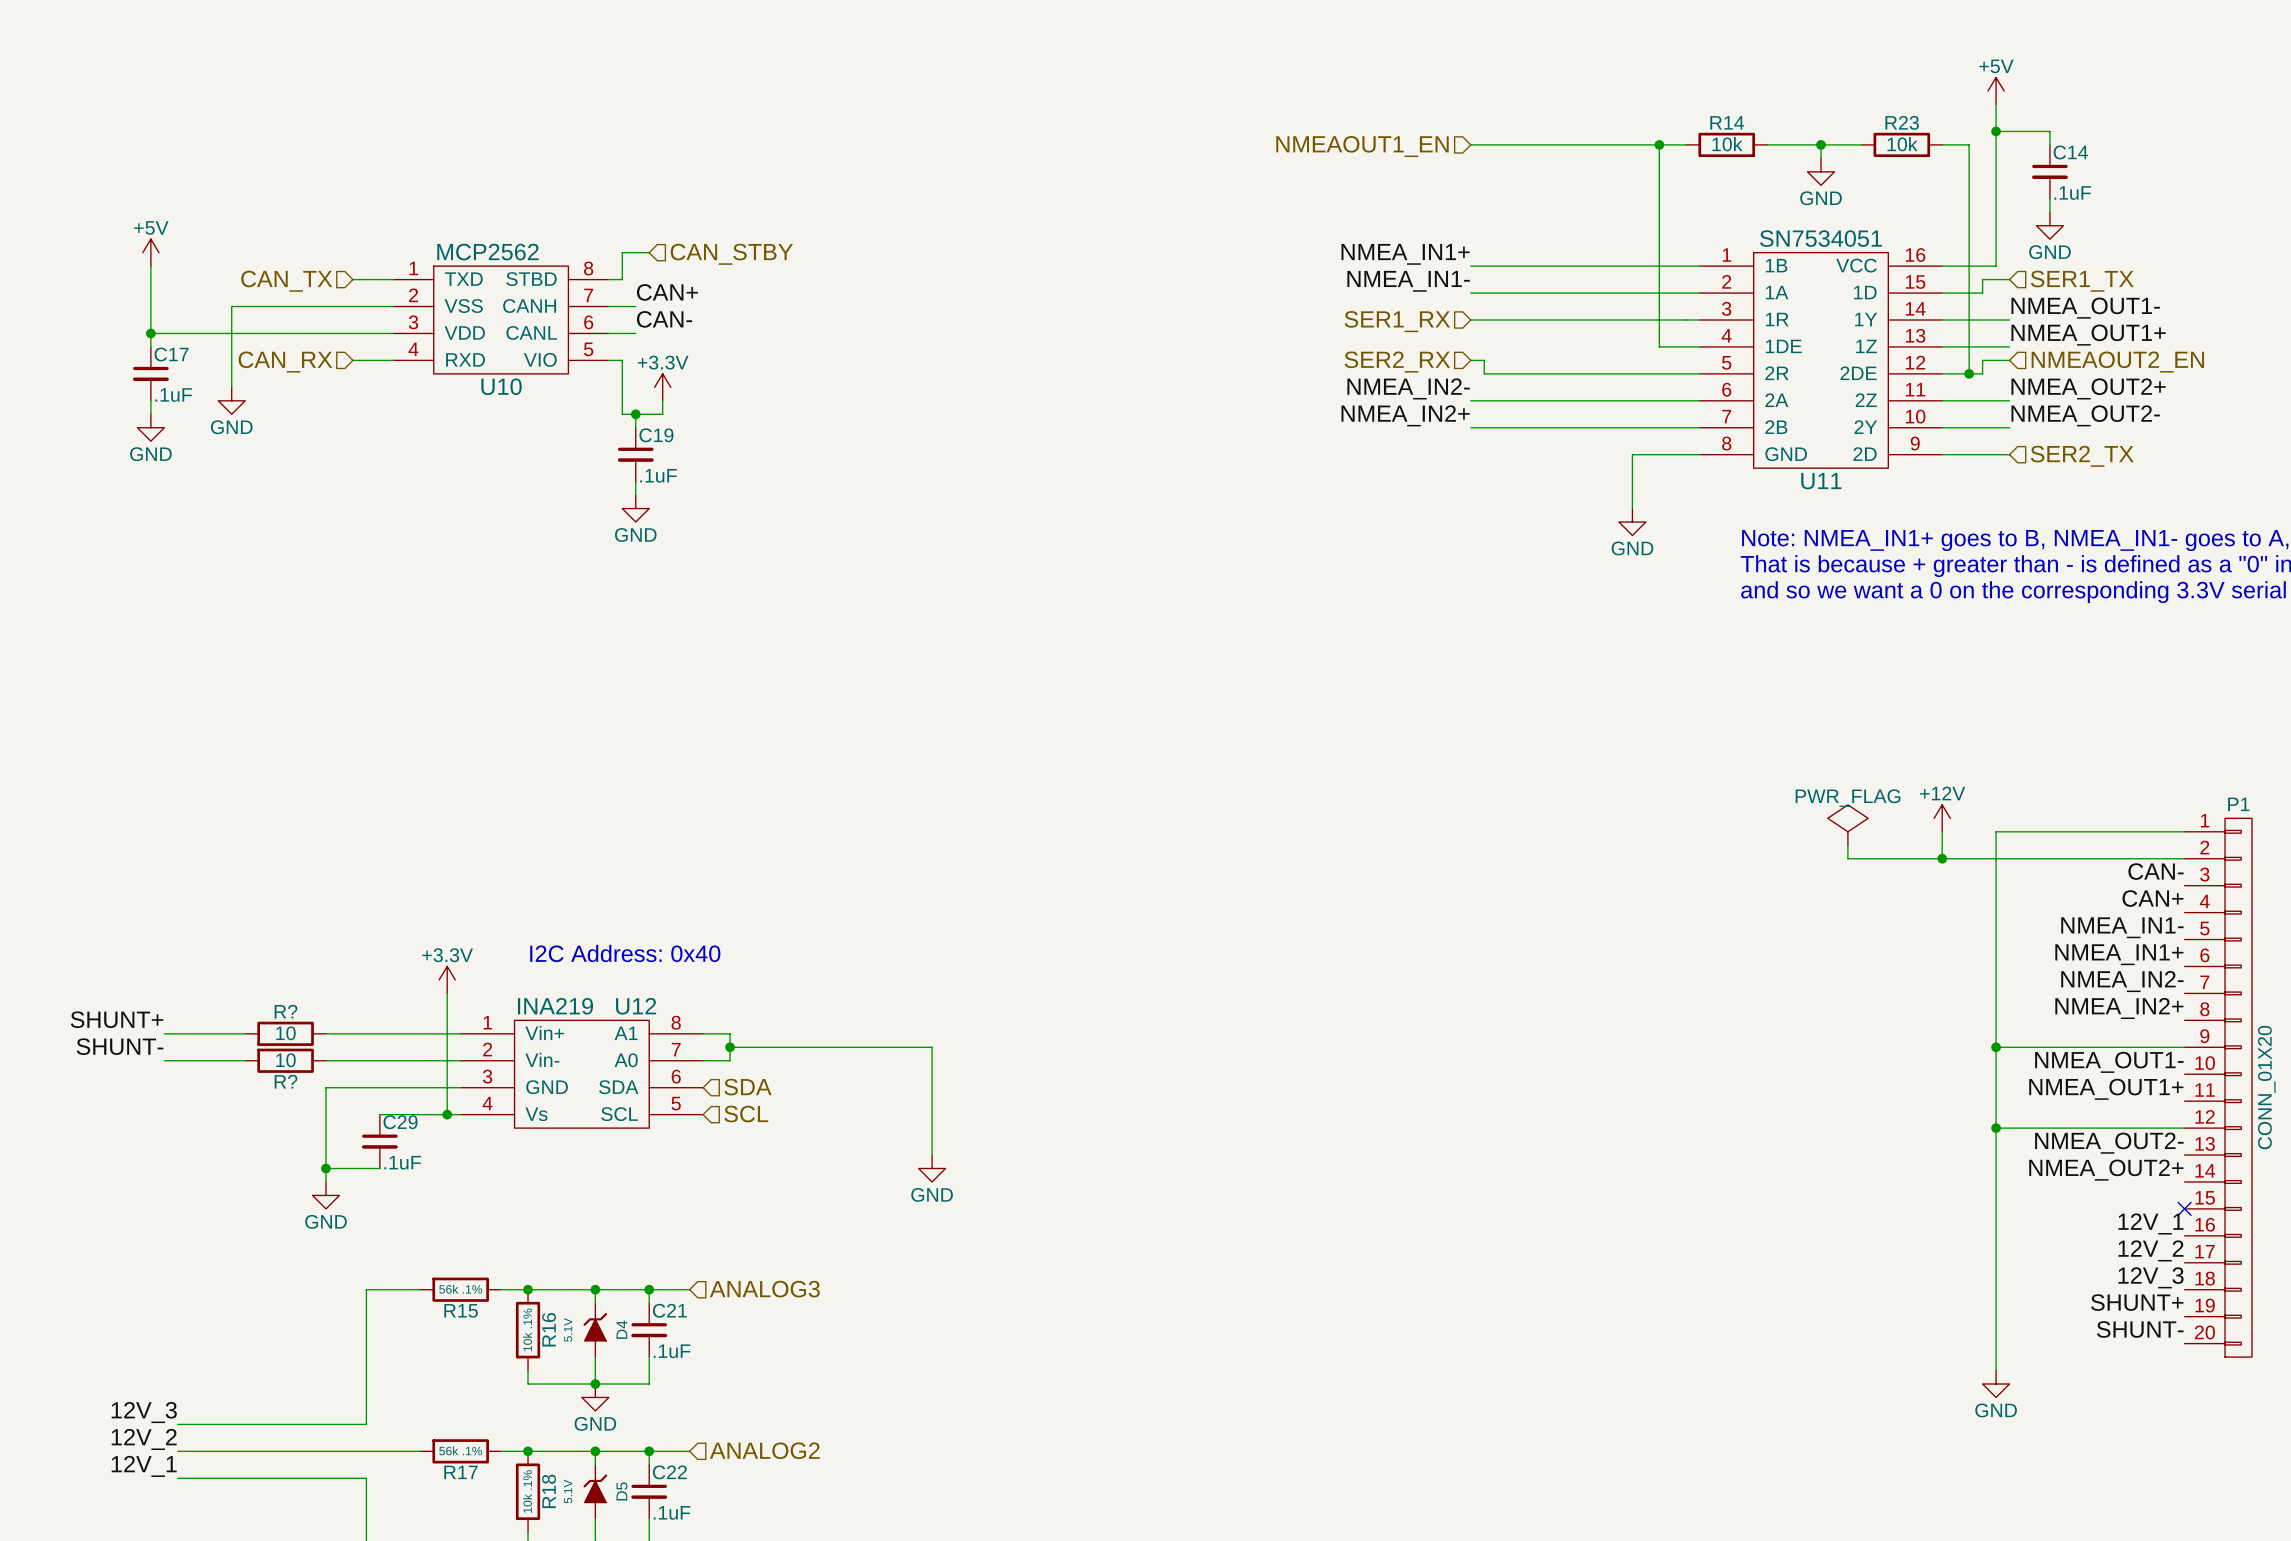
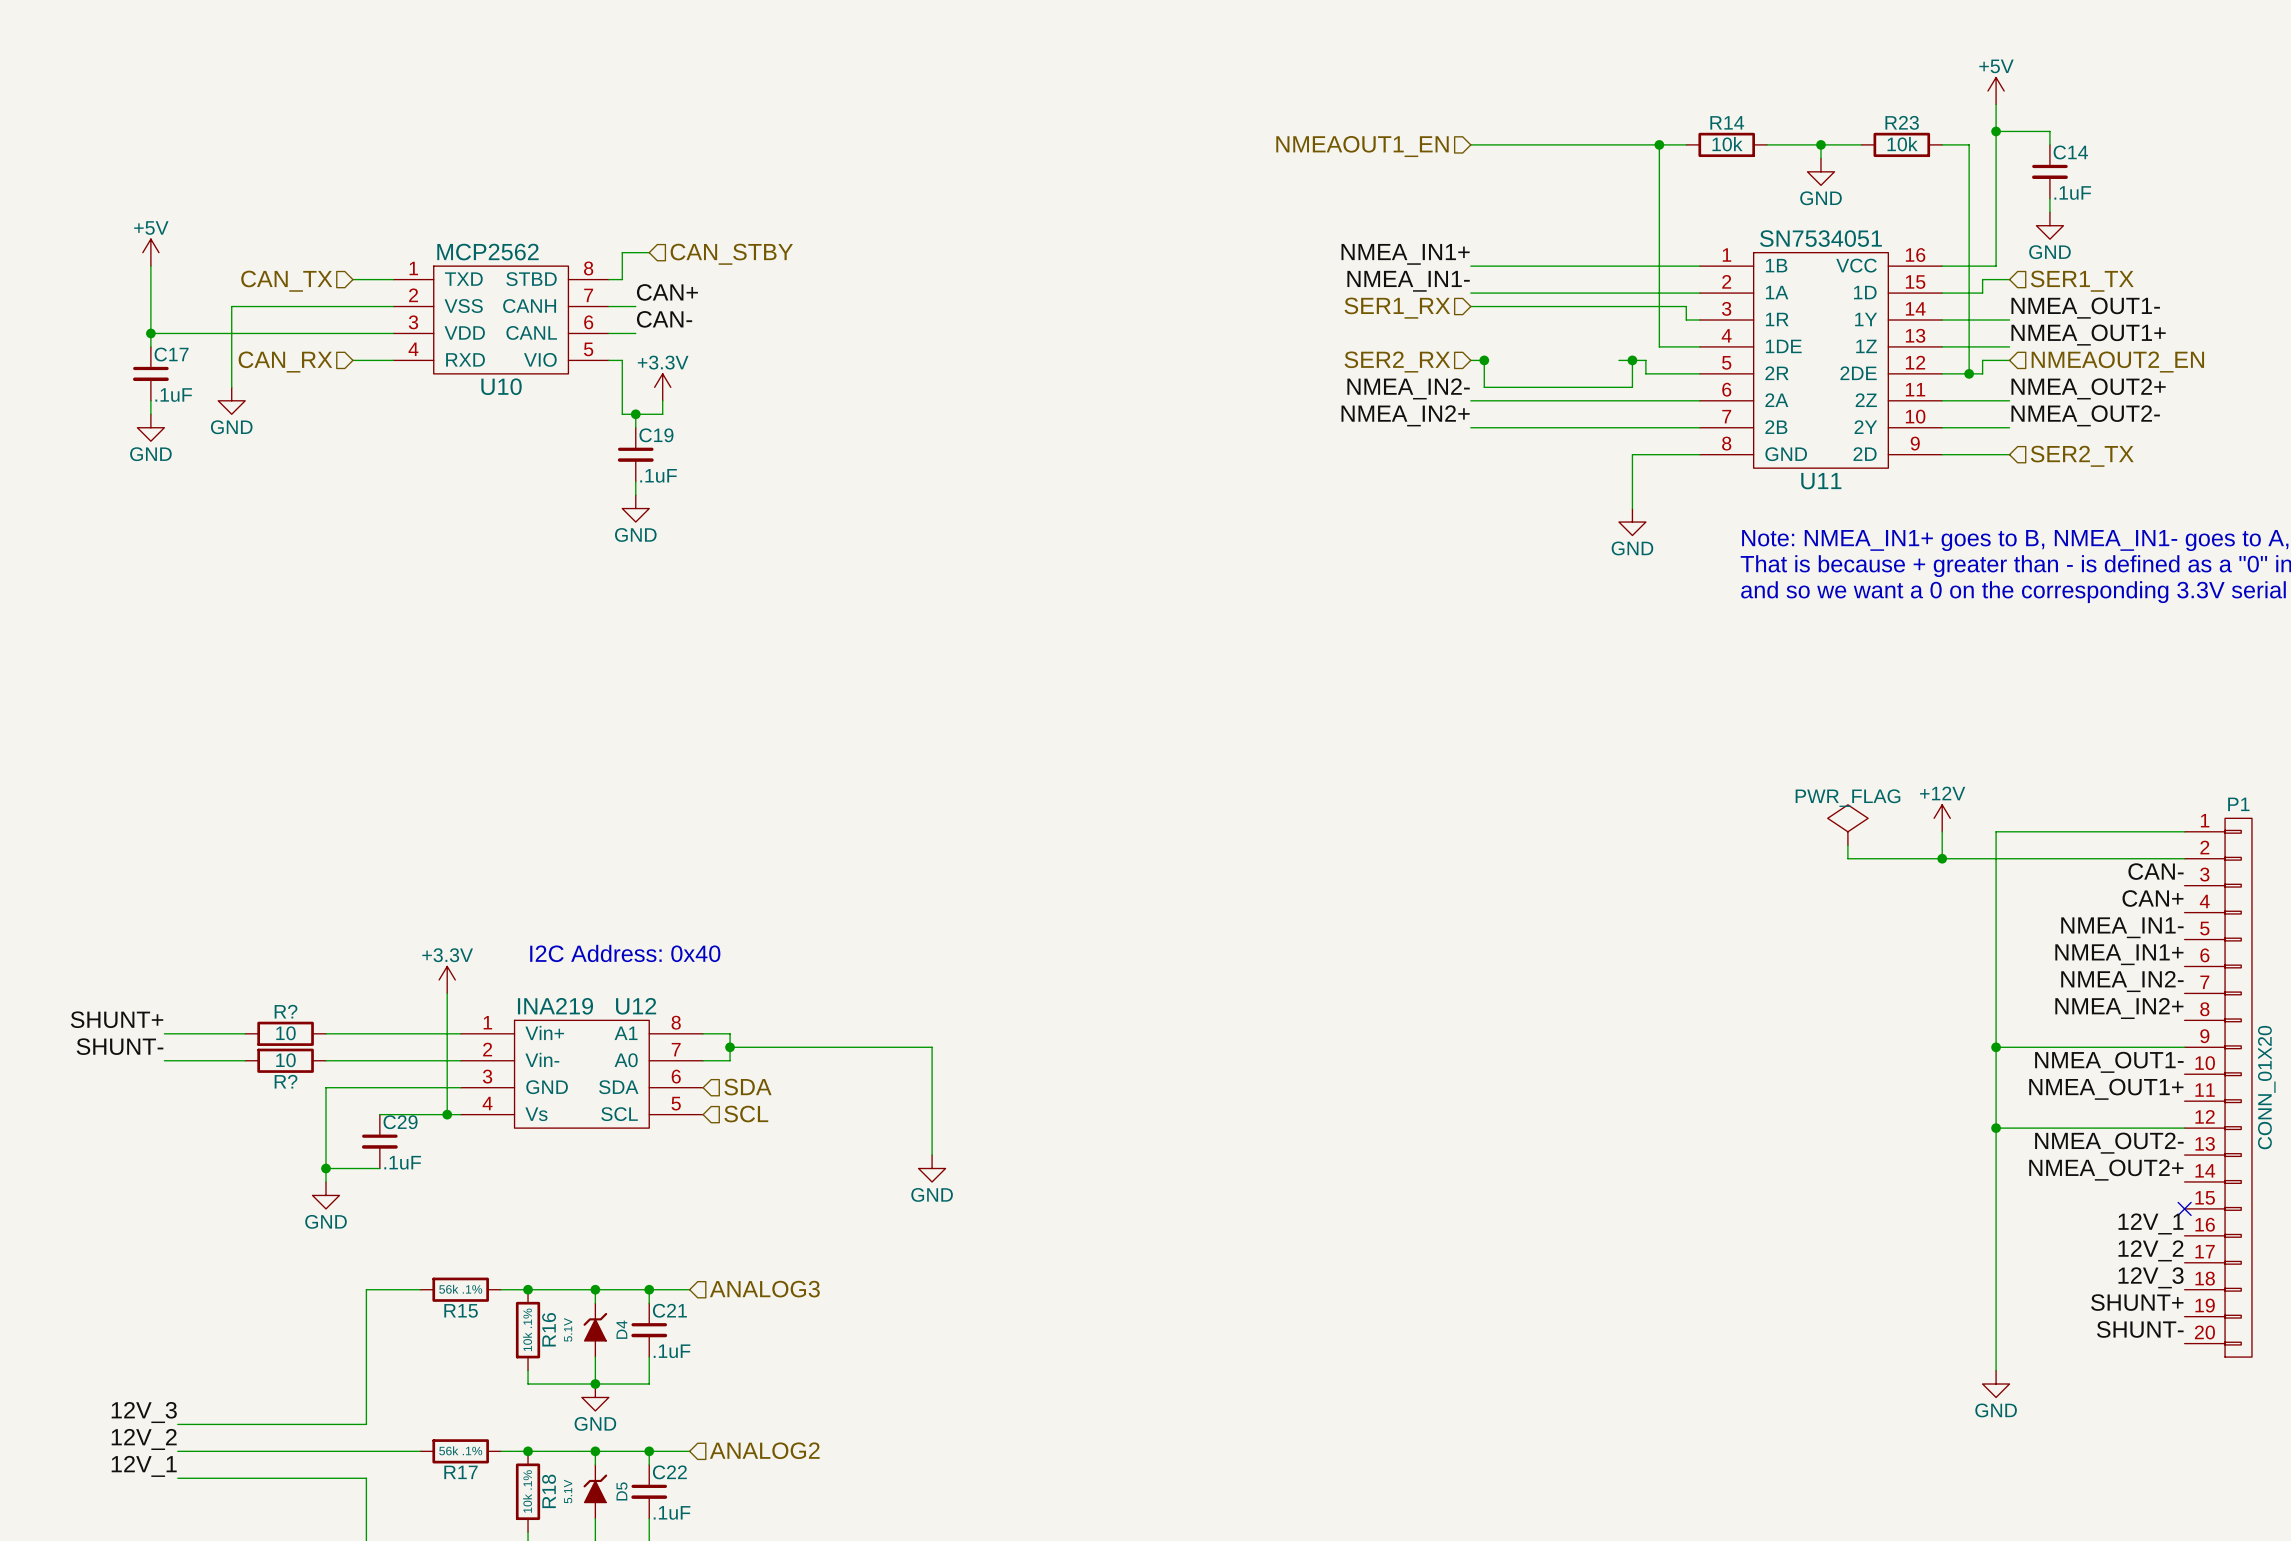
wire: (1470, 320) (1686, 320) -> (1470, 306) (1686, 306) (1686, 320)
hierarchical label position: SER1_RX (1397, 321) -> SER1_RX (1397, 308)
junction: none -> (1484, 360)
wire: none -> (1618, 360) (1645, 360) (1645, 373)
junction: none -> (1632, 360)
wire: (1484, 373) (1645, 373) -> (1484, 373) (1484, 387) (1632, 387) (1632, 360)

